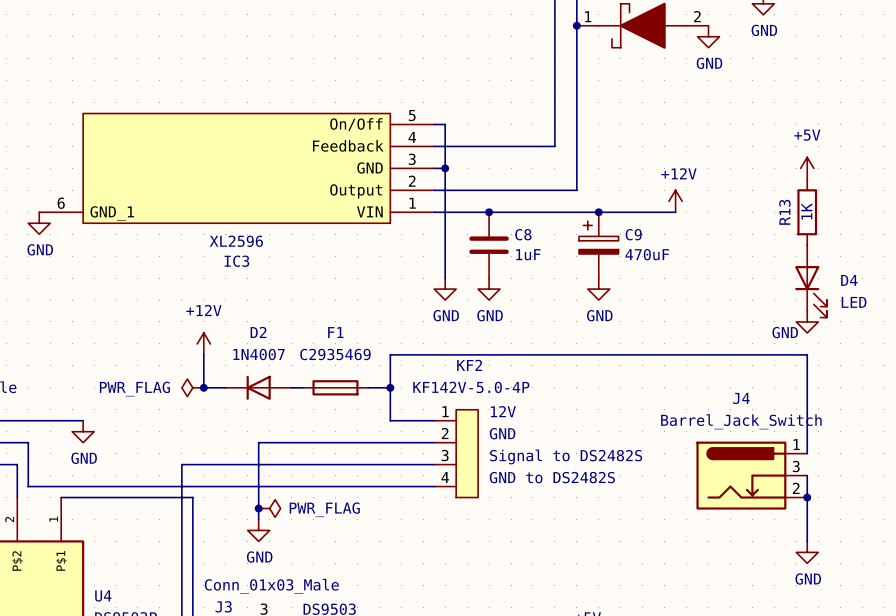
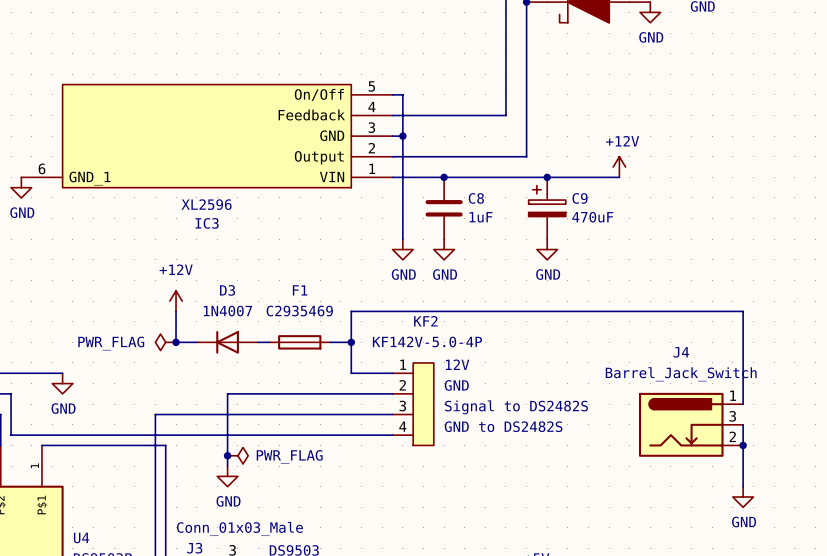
power symbol: +5V (807, 168) -> none
R13: 1K (807, 212) -> none
D4: LED (811, 281) -> none
power symbol: GND (807, 321) -> none
D2 name: D2 (258, 332) -> D3 (227, 290)

